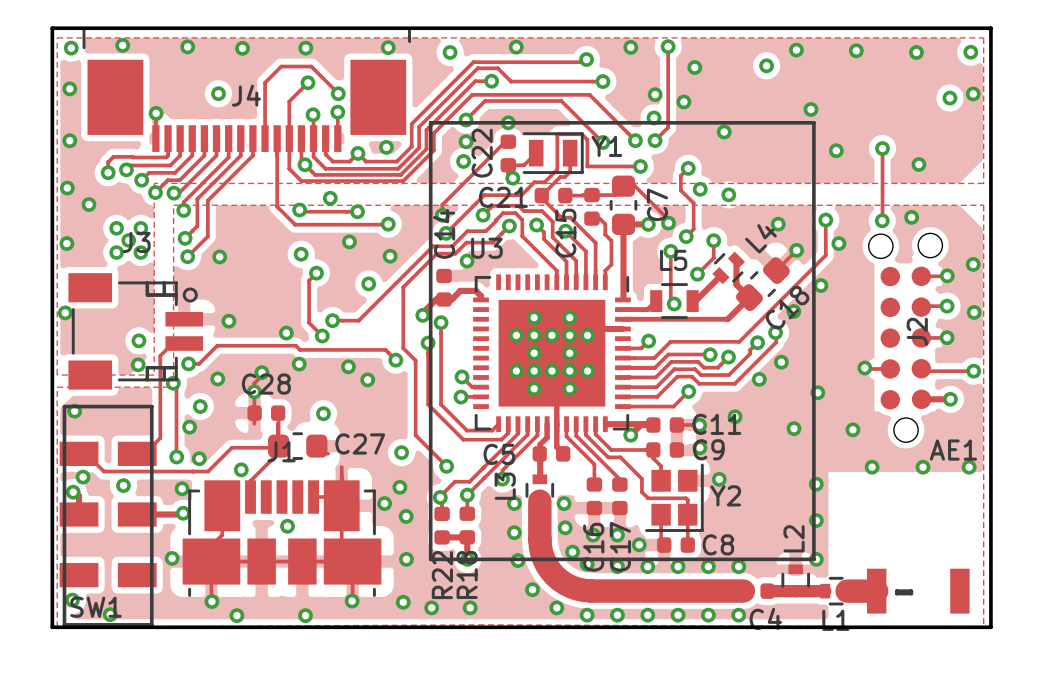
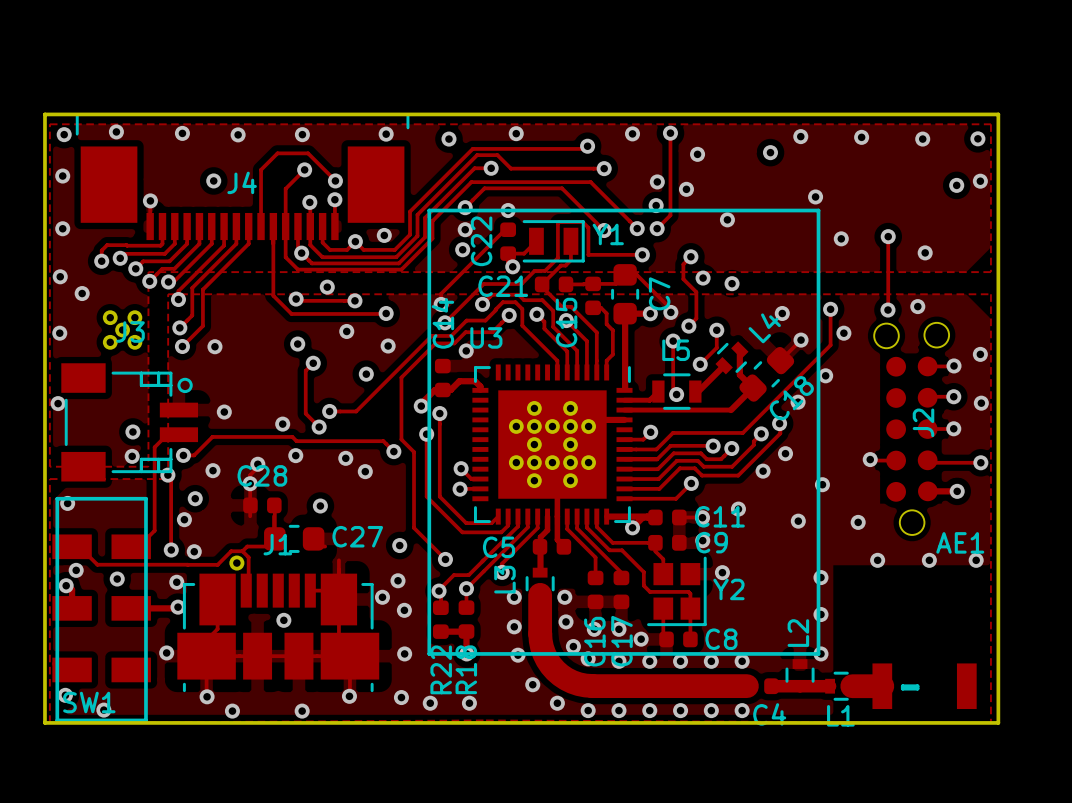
track: (278, 446) (278, 452) (250, 481) (250, 497) -> none
track: (277, 452) (273, 447) (231, 447) (208, 471) -> (242, 551) (231, 551) (217, 564) (203, 564)
track: none -> (274, 545) (275, 546) (247, 546) (242, 551)
track: none -> (242, 551) (248, 557) (248, 588)

